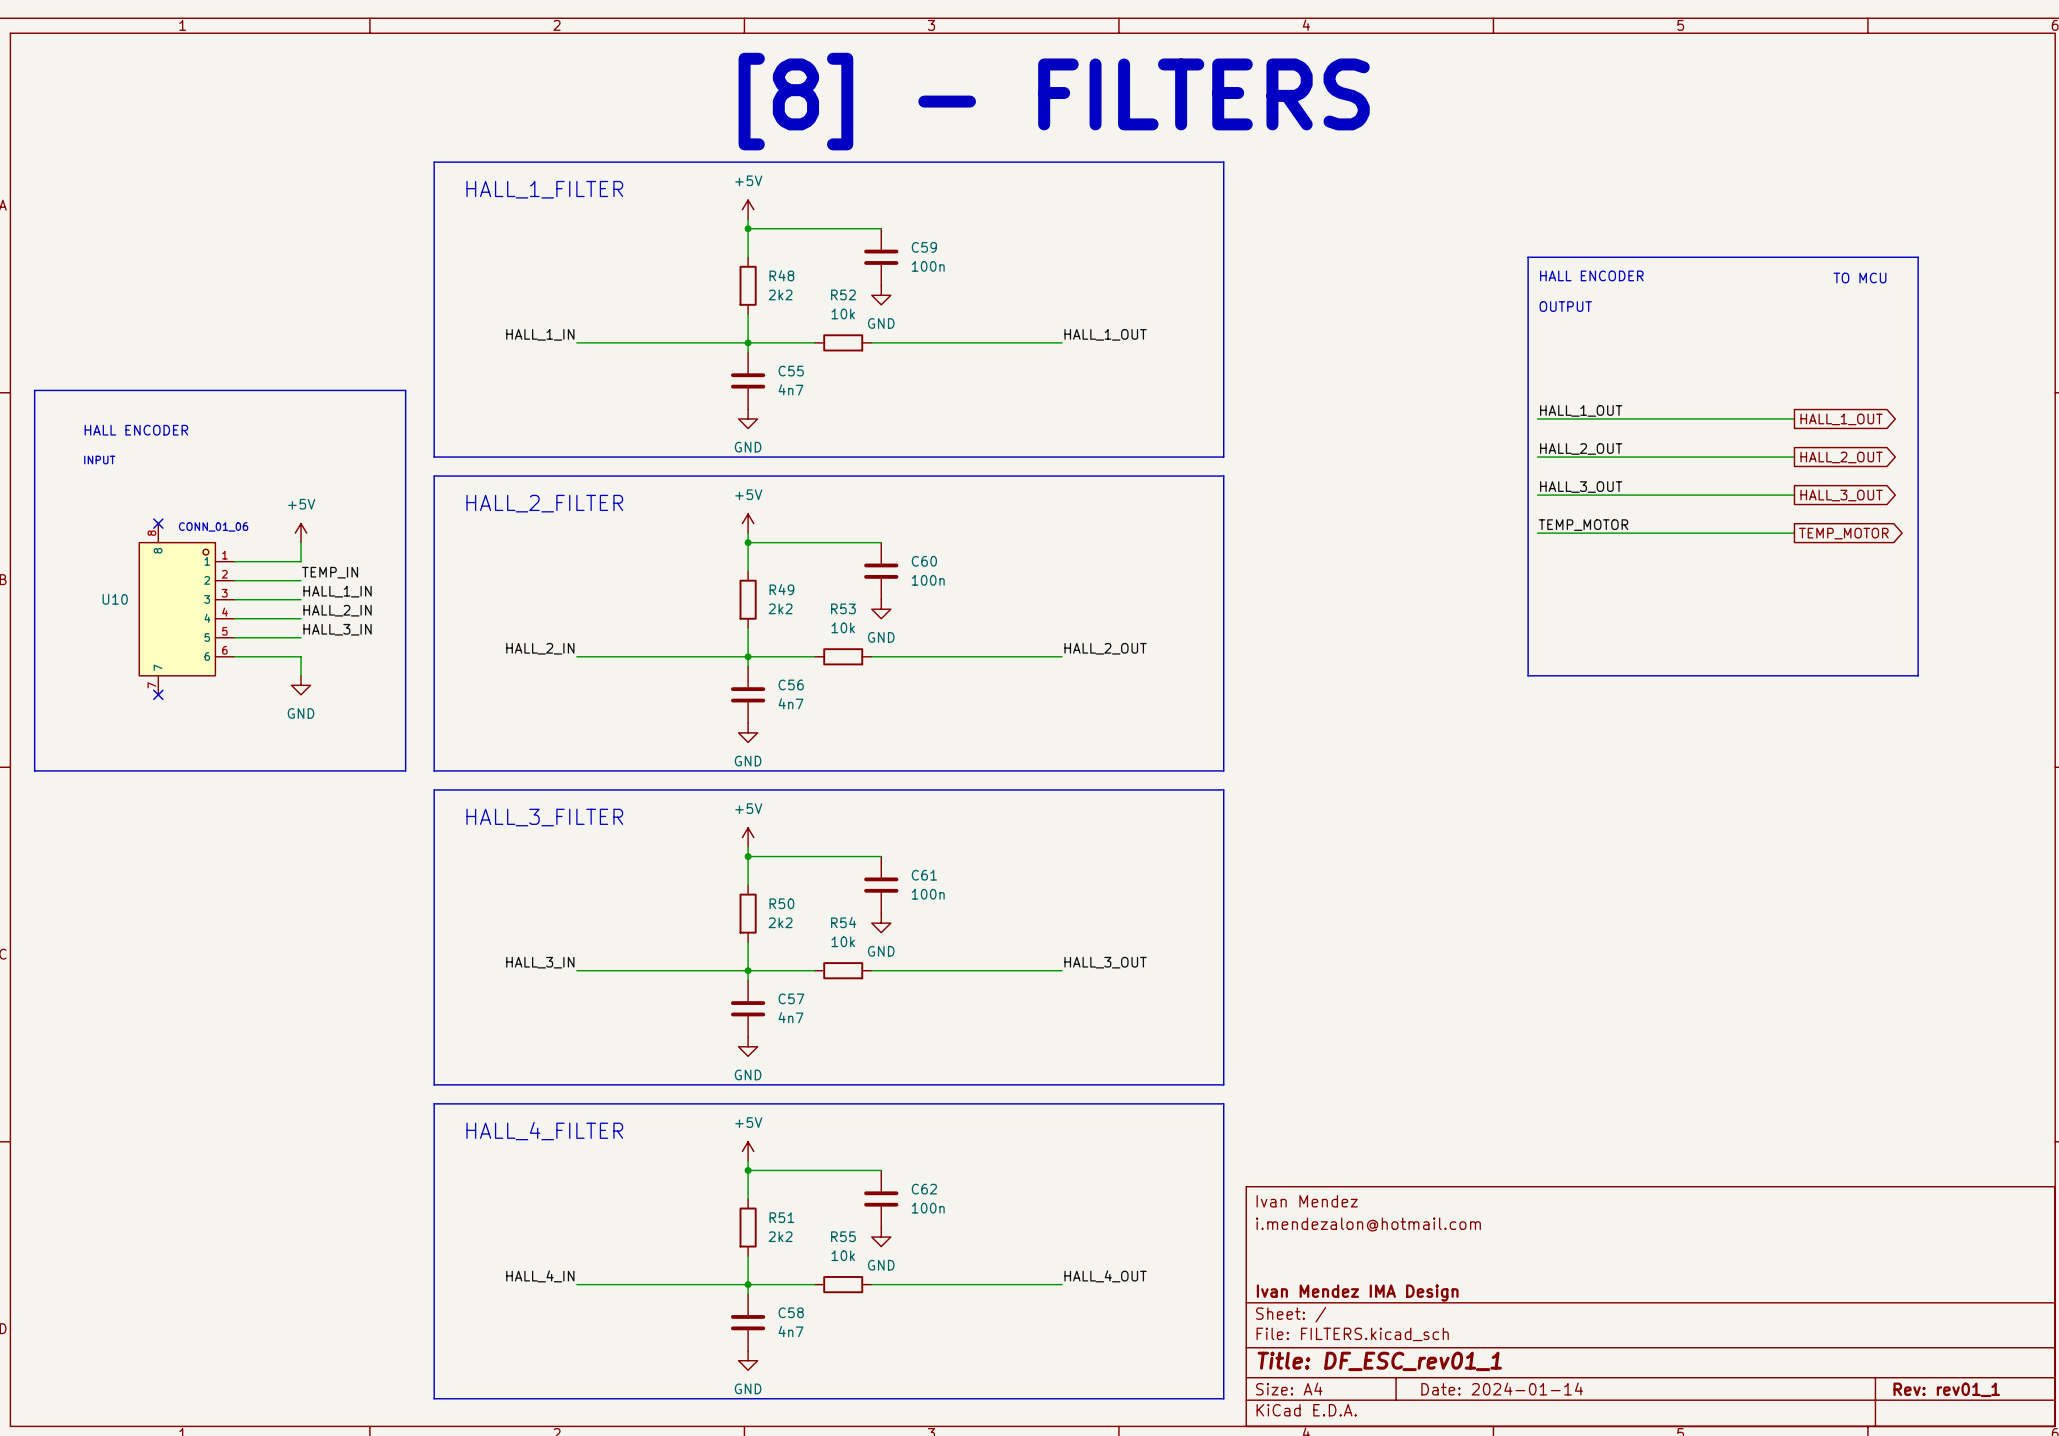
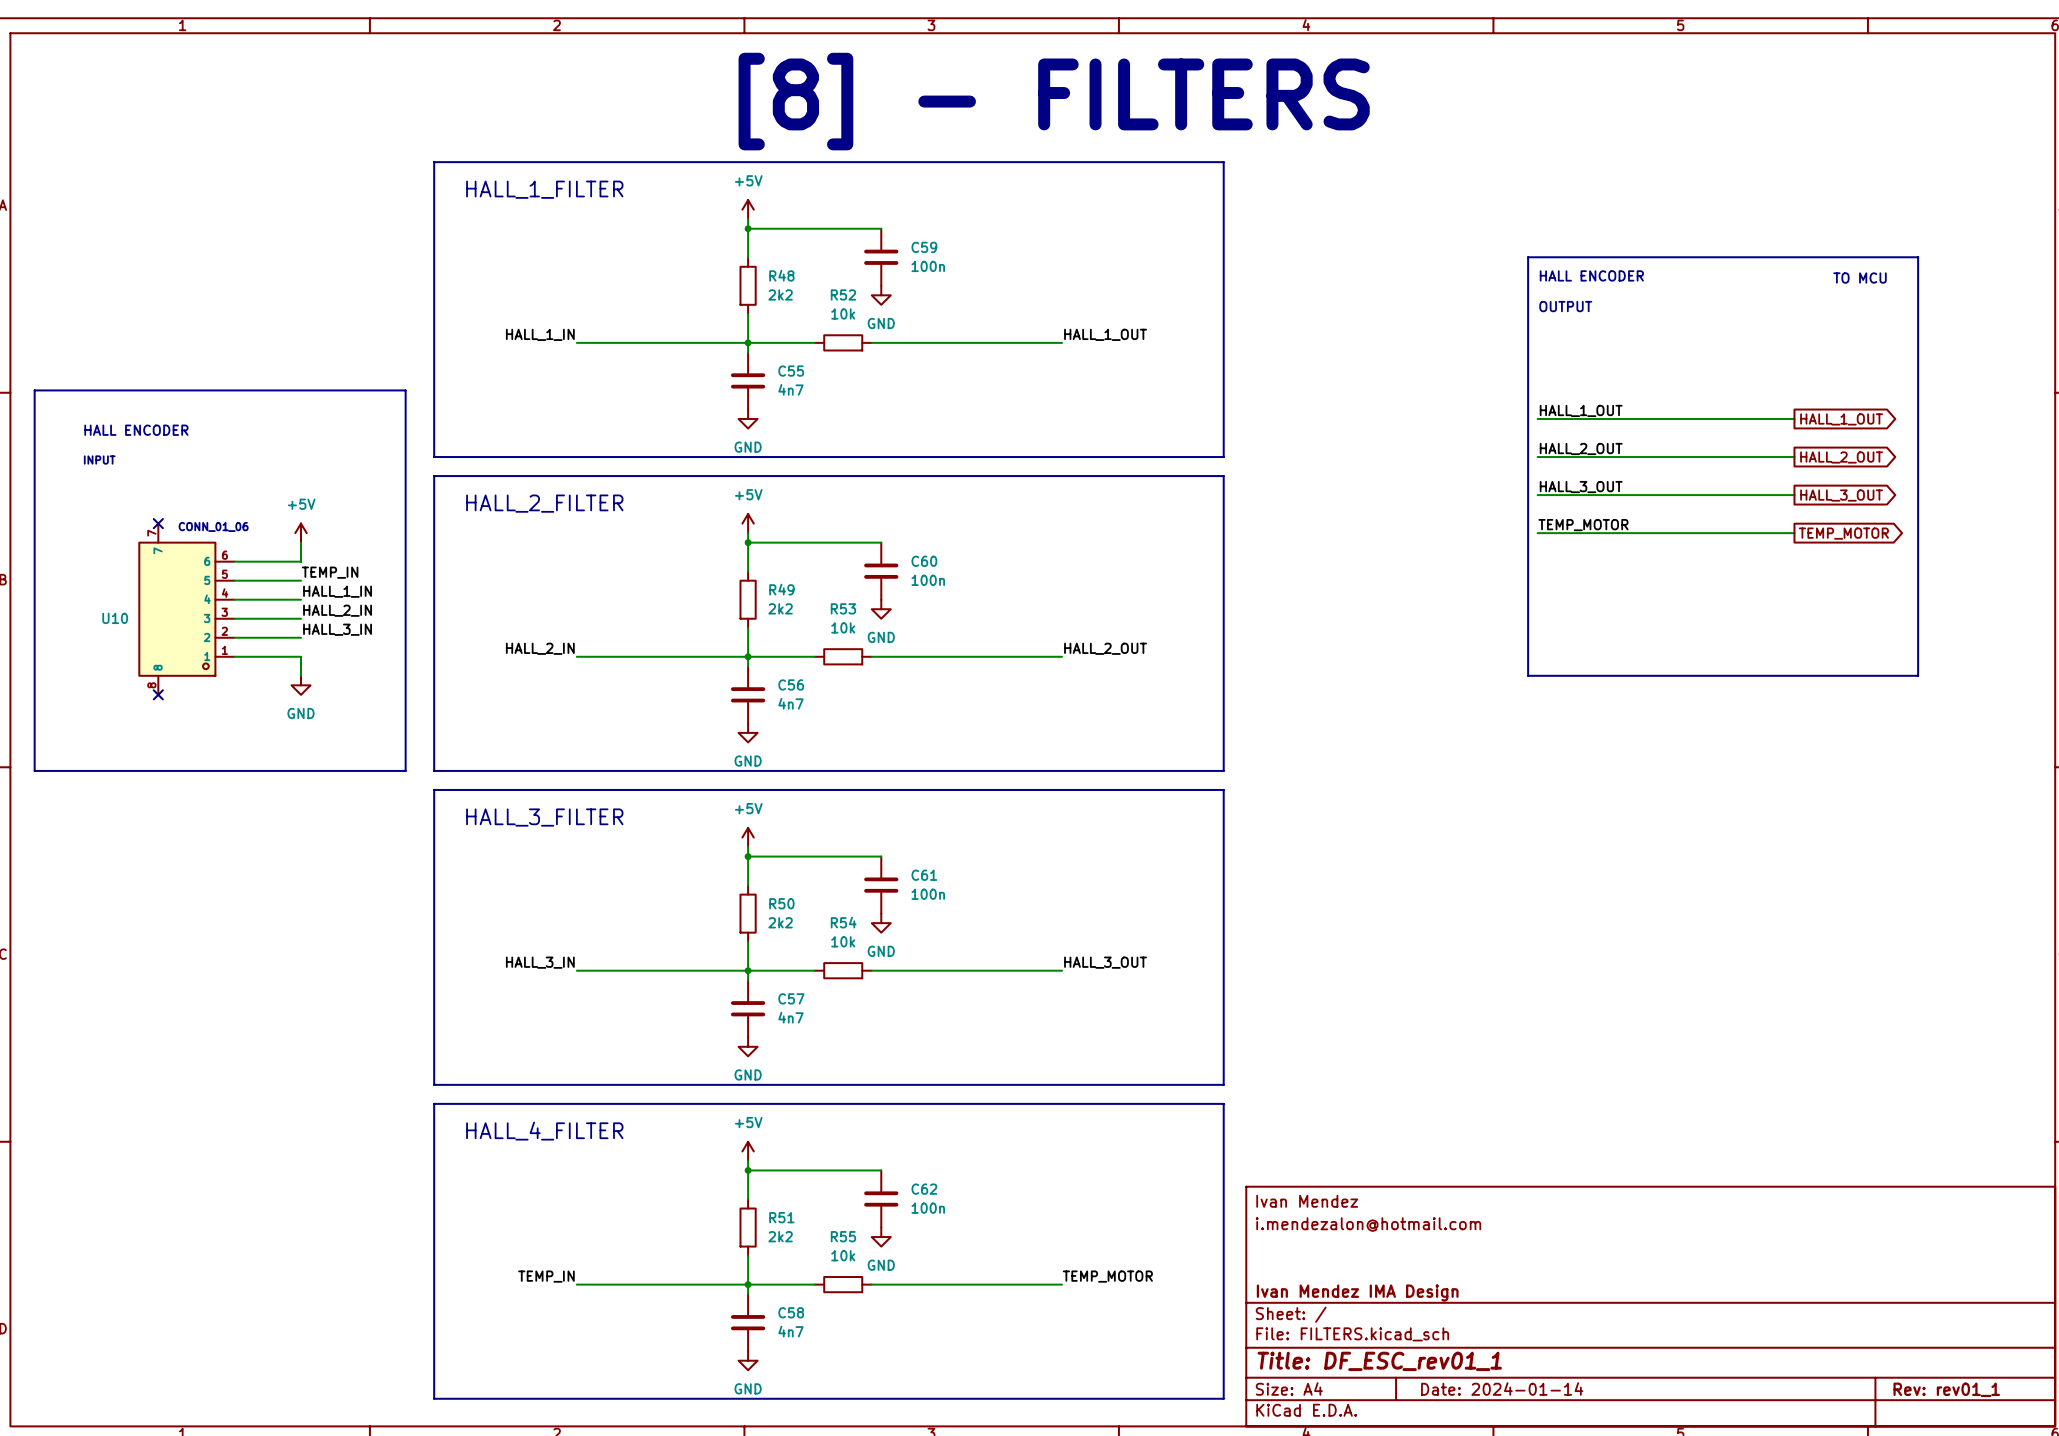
U10 flip: as is (177, 609) -> up-down (177, 609)
label: HALL_4_IN (540, 1276) -> TEMP_IN (546, 1276)
label: HALL_4_OUT (1105, 1276) -> TEMP_MOTOR (1107, 1276)

